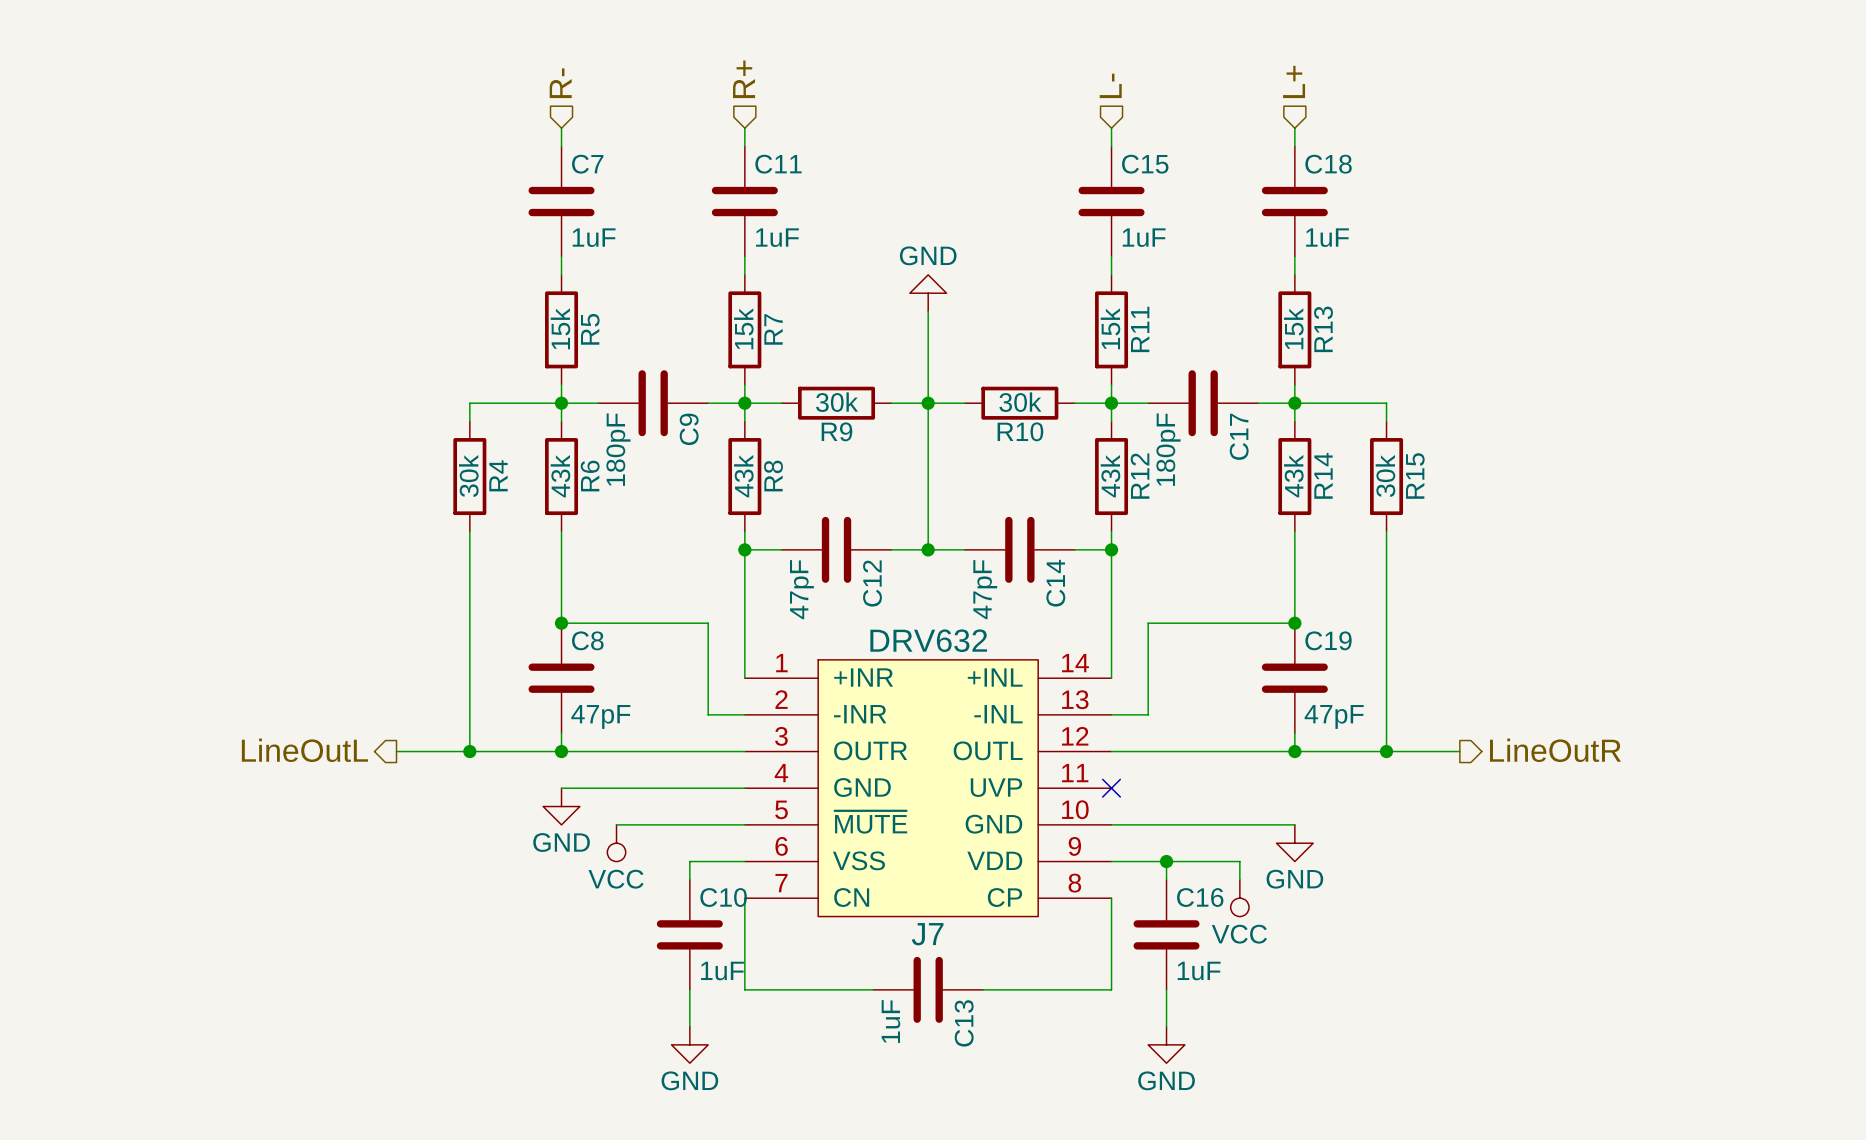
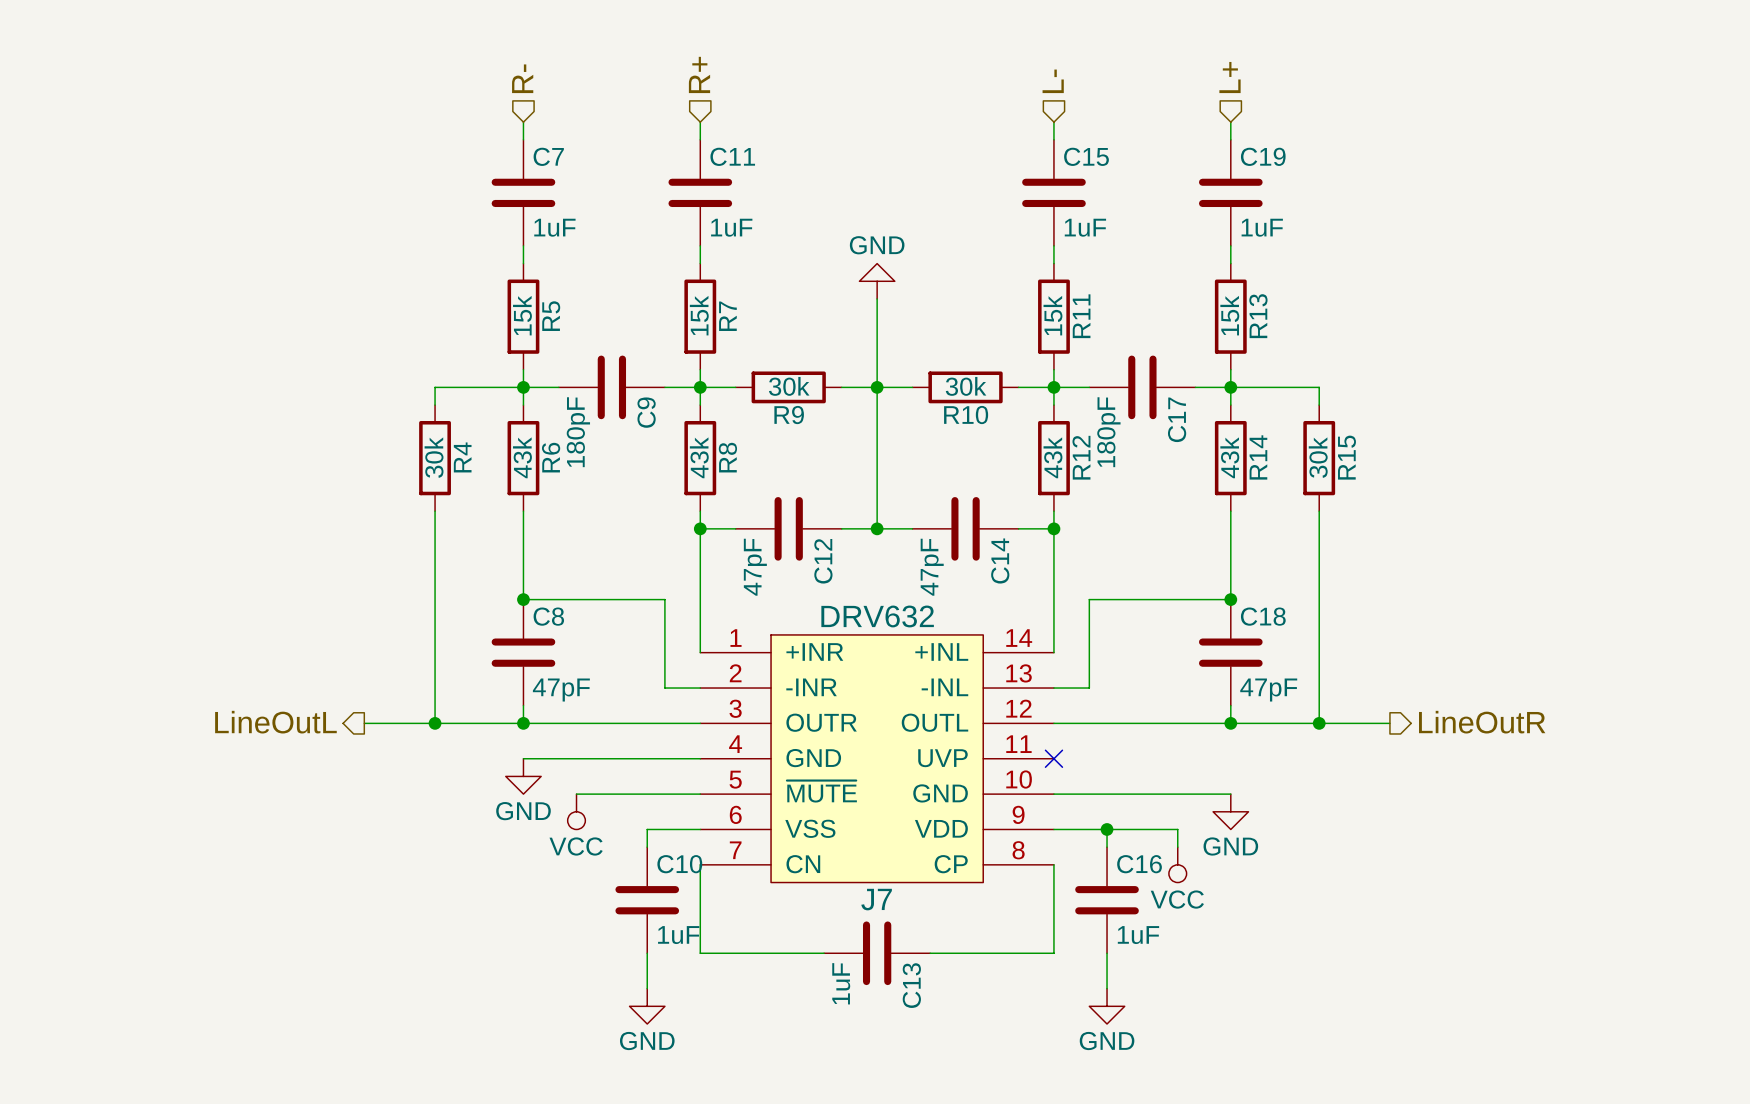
C18 name: C18 (1328, 164) -> C19 (1263, 156)
C19 name: C19 (1328, 640) -> C18 (1263, 616)

